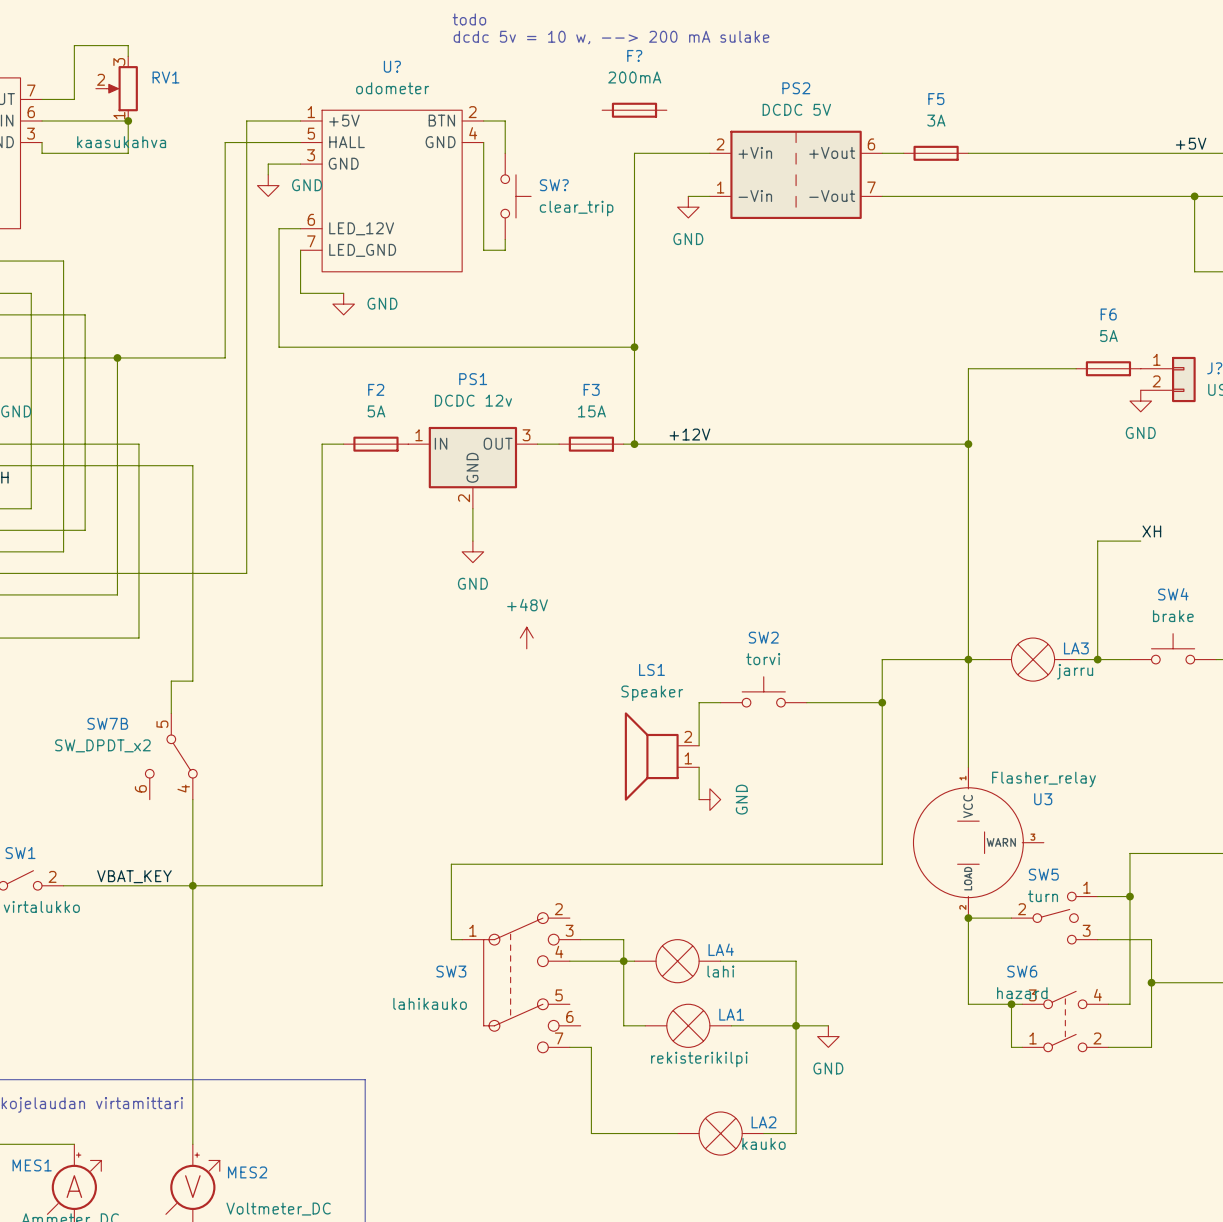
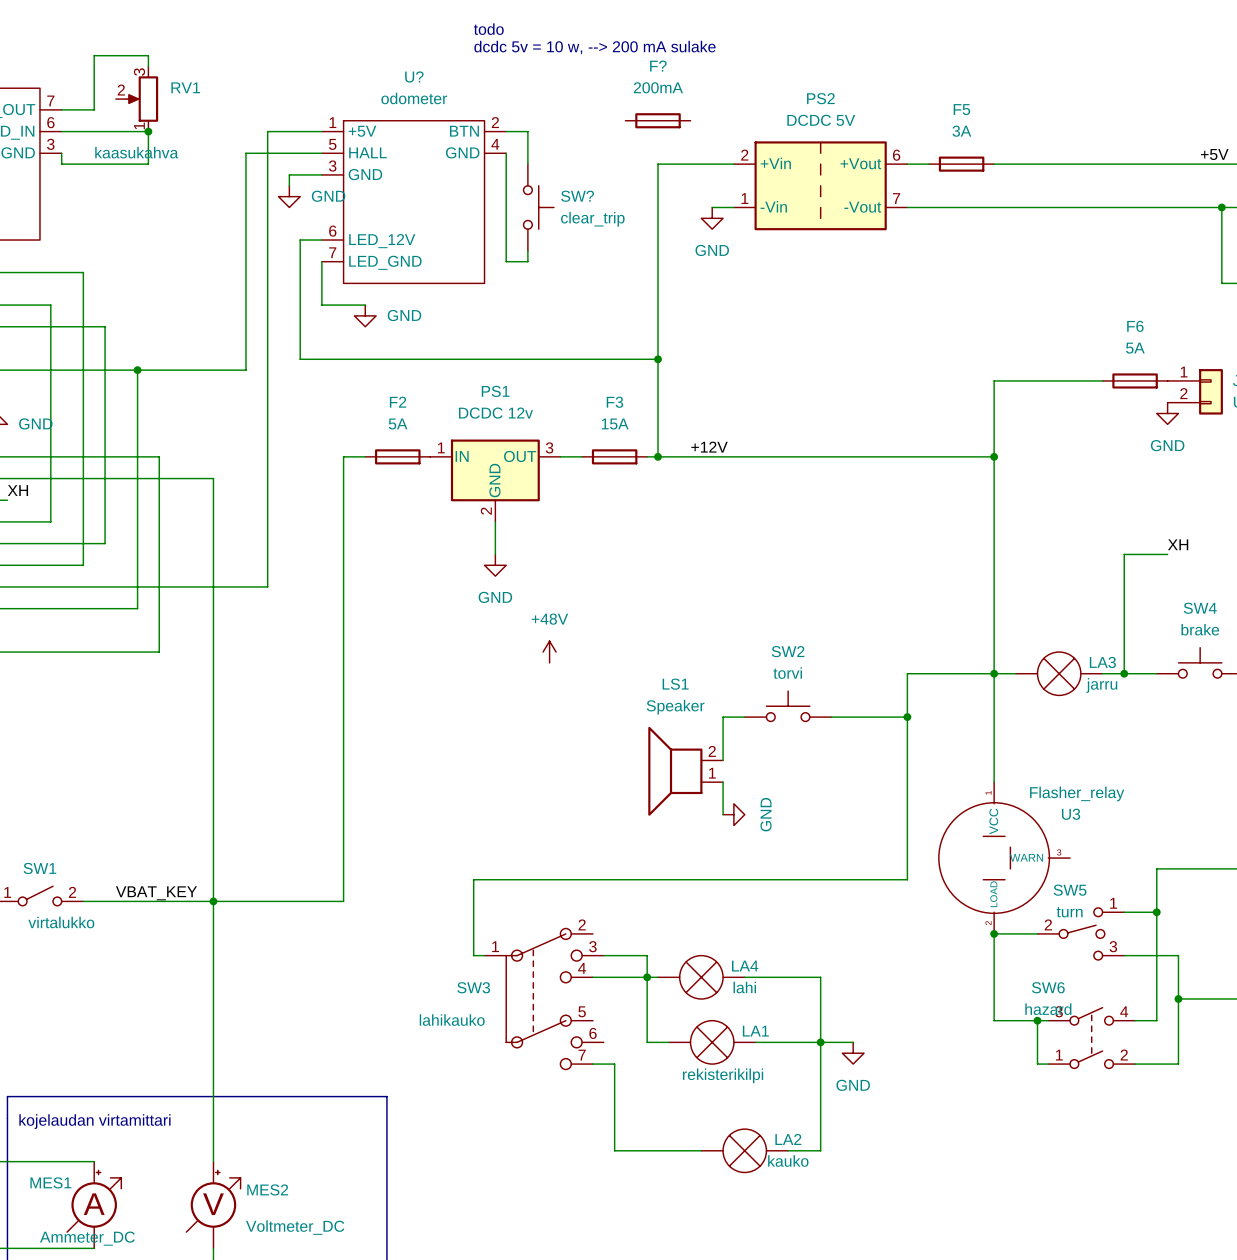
wire: (192, 681) (171, 681) (171, 713) -> (213, 695) (213, 814)
SW7B: SW_DPDT_x2 (171, 756) -> none

